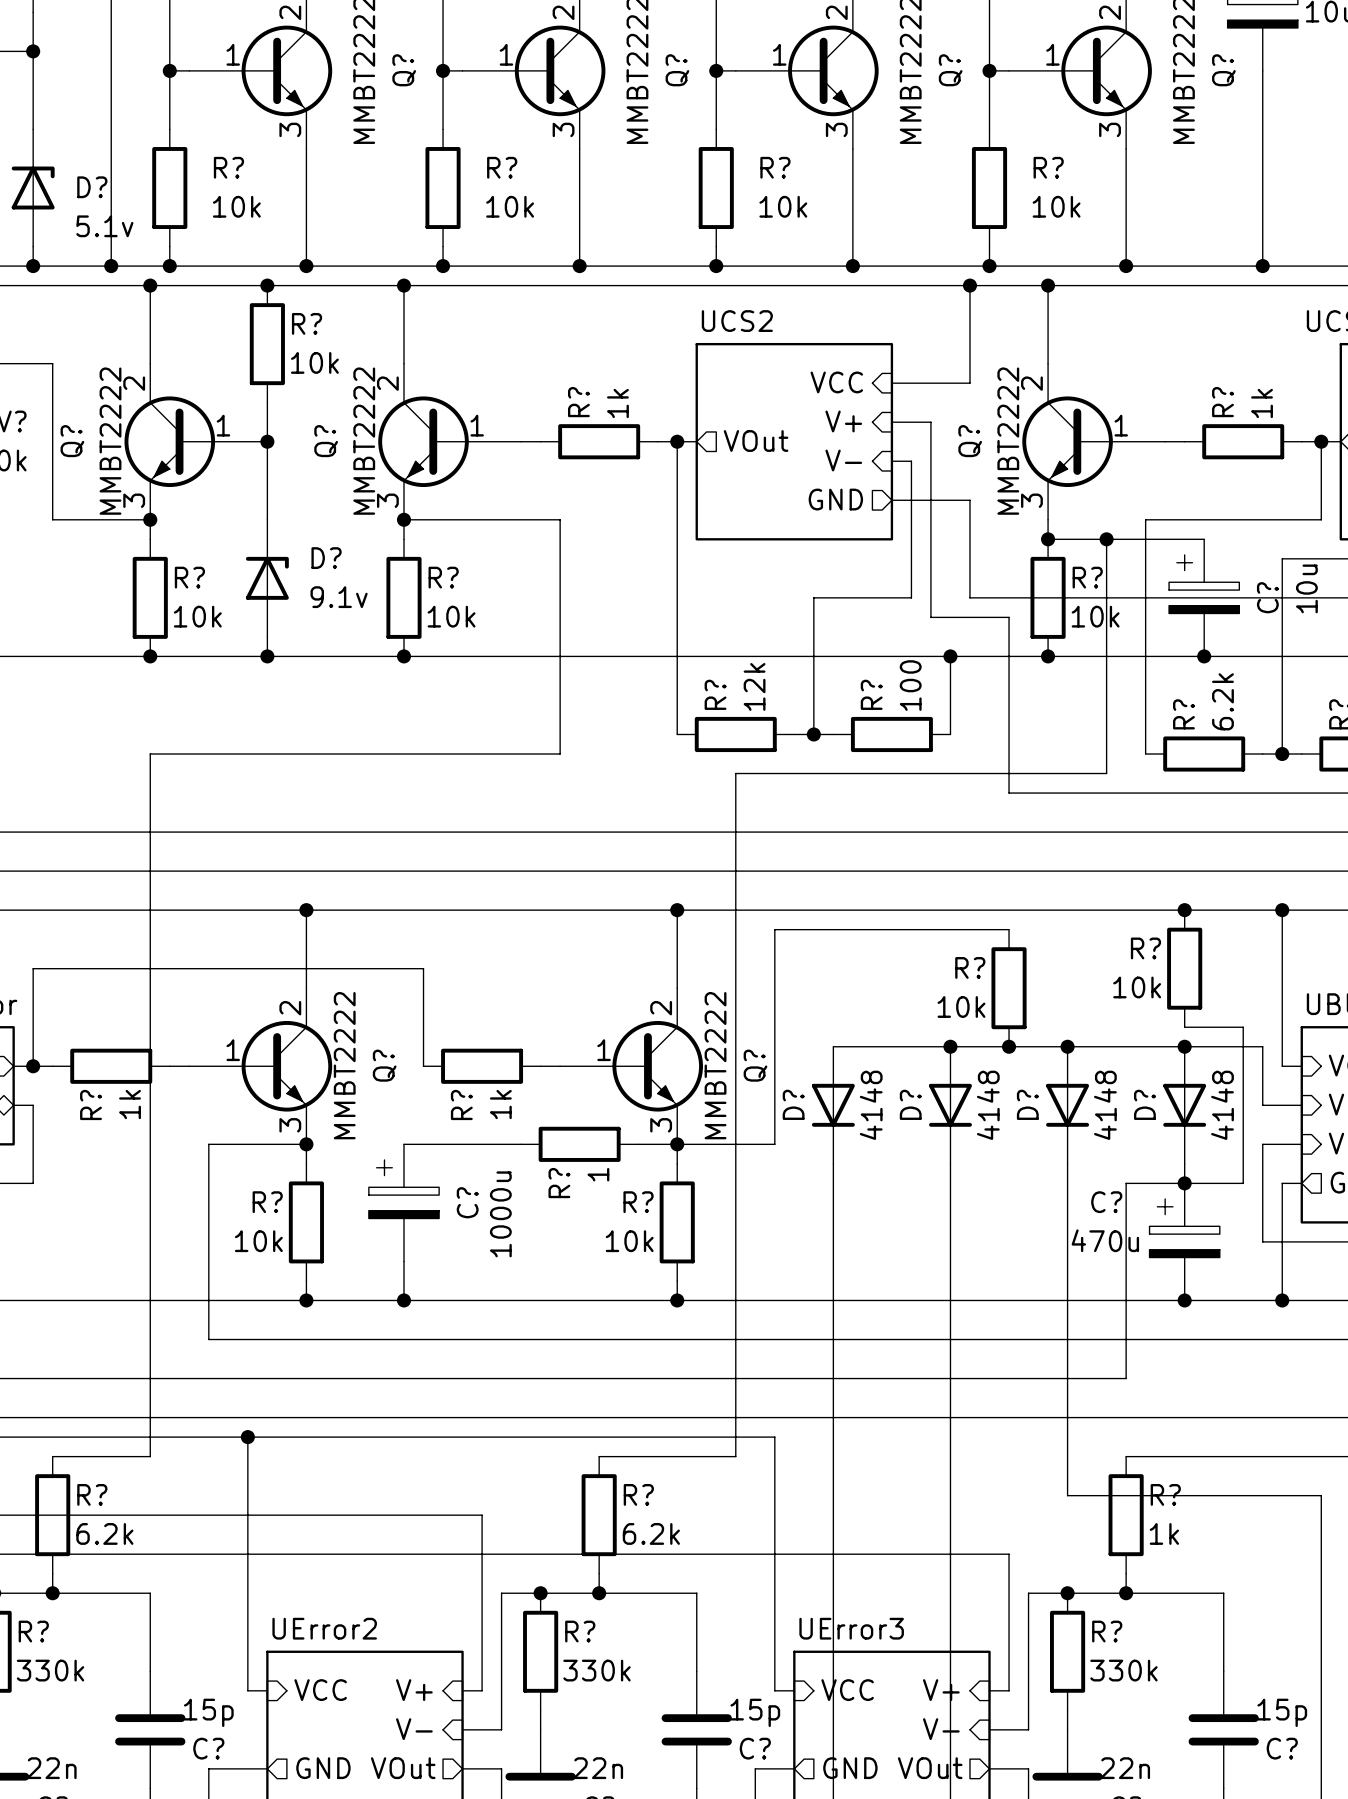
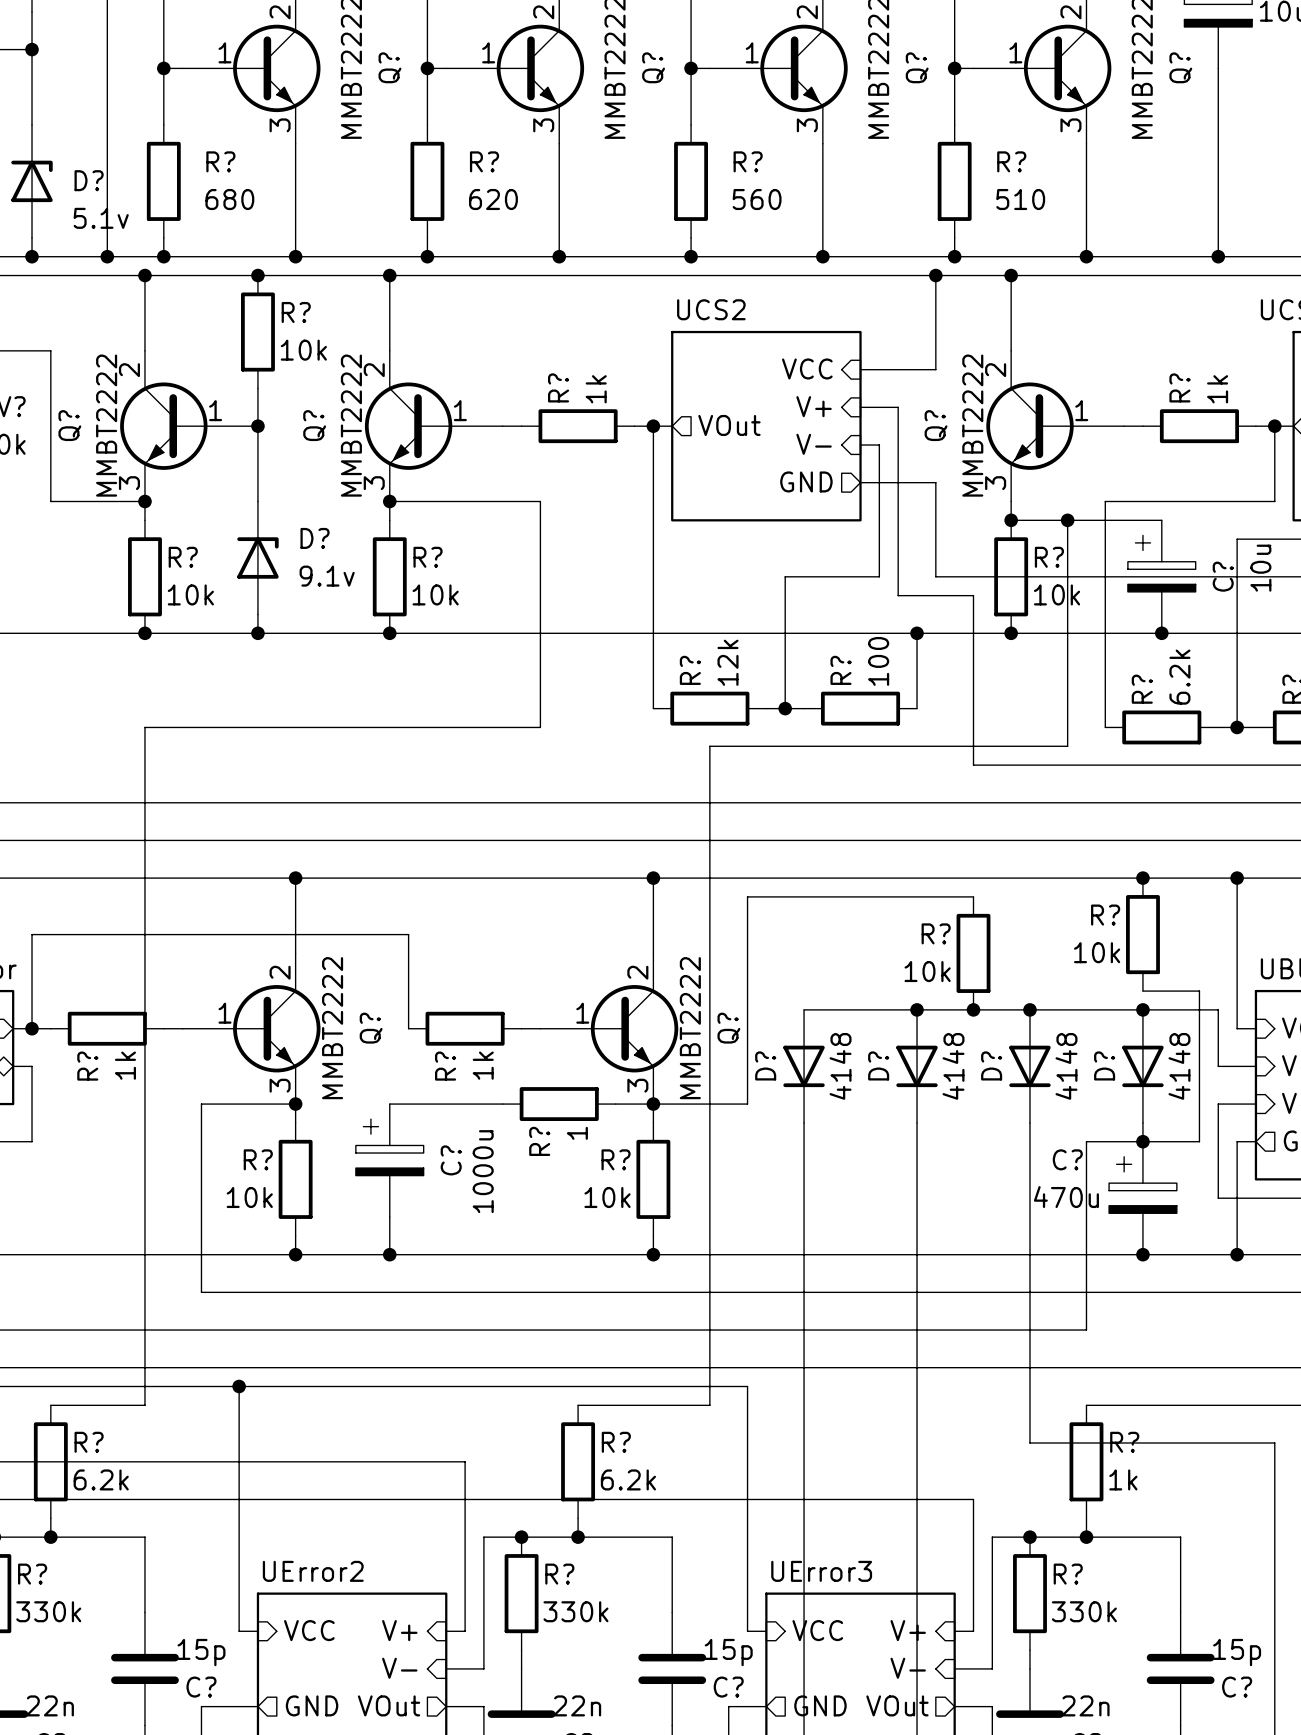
R? value: 10k (236, 206) -> 680 (229, 199)
R? value: 10k (510, 206) -> 620 (493, 199)
R? value: 10k (783, 206) -> 560 (757, 199)
R? value: 10k (1056, 206) -> 510 (1020, 199)

